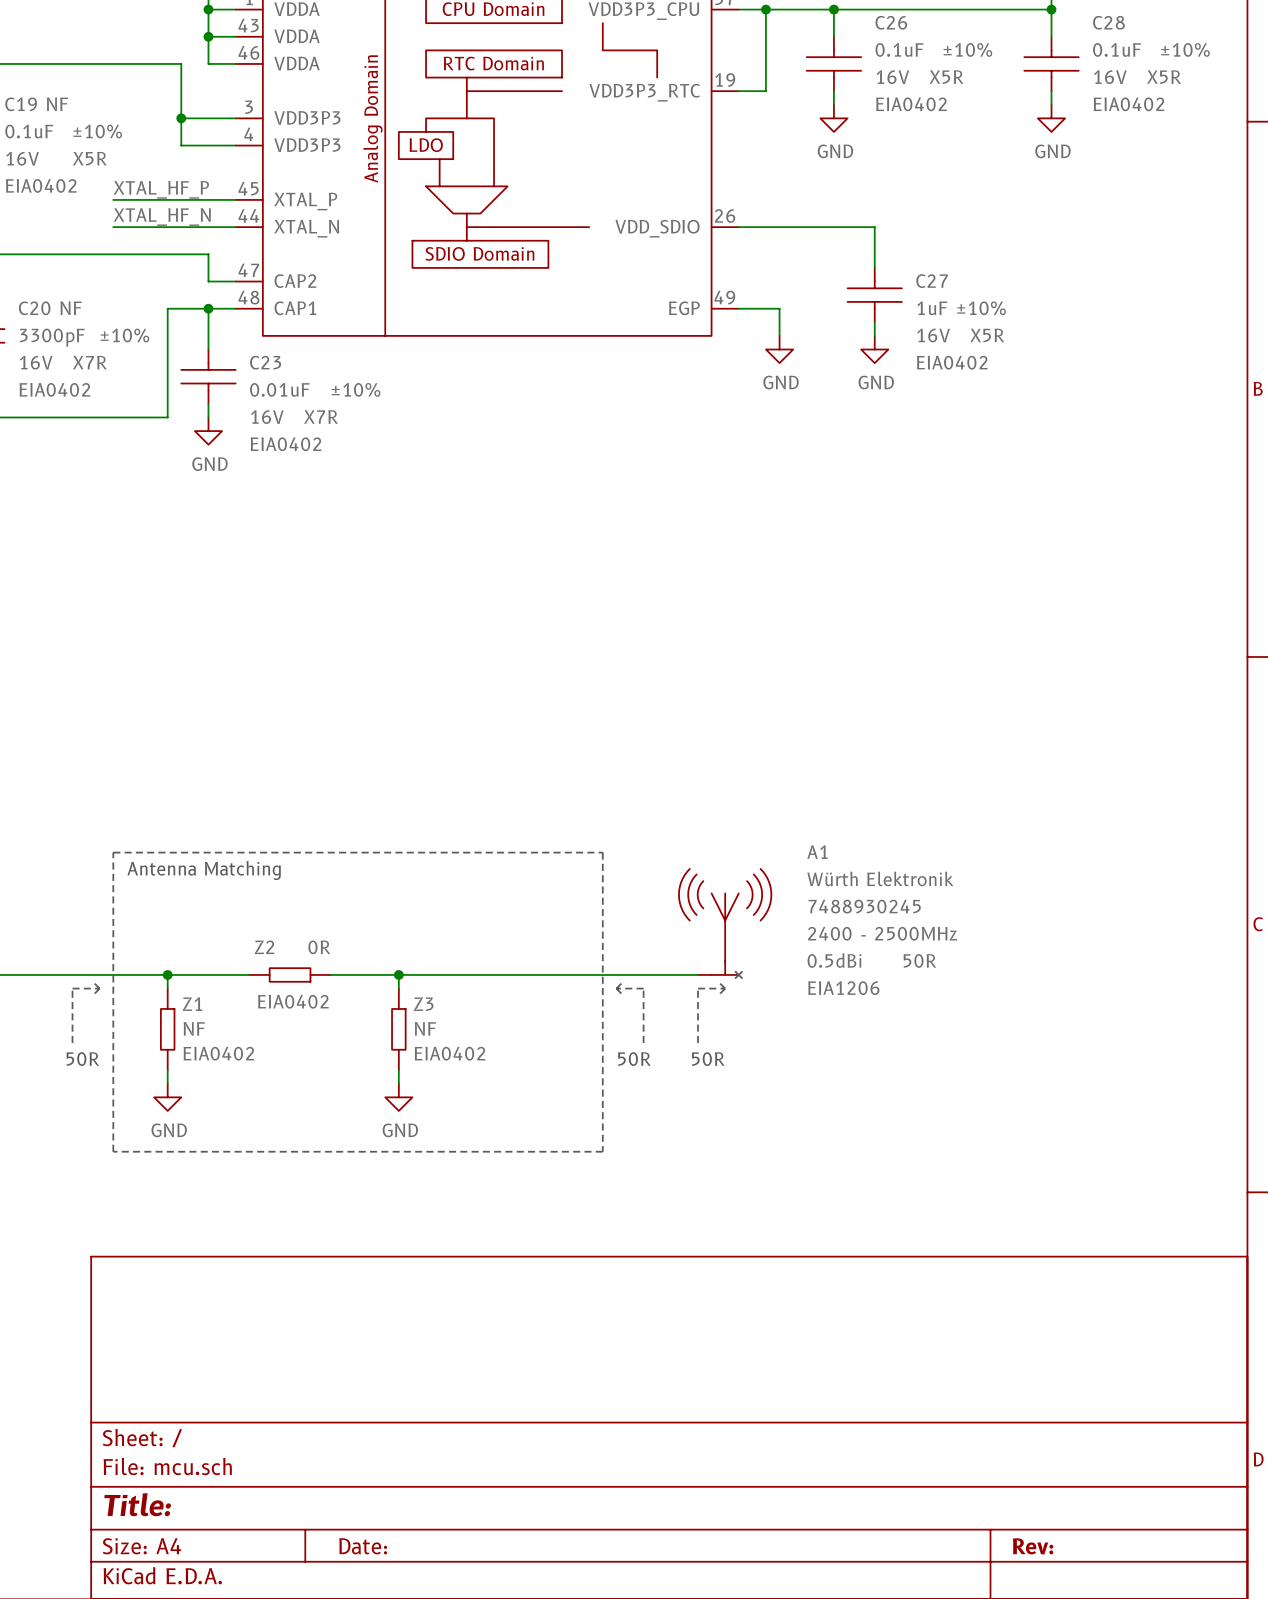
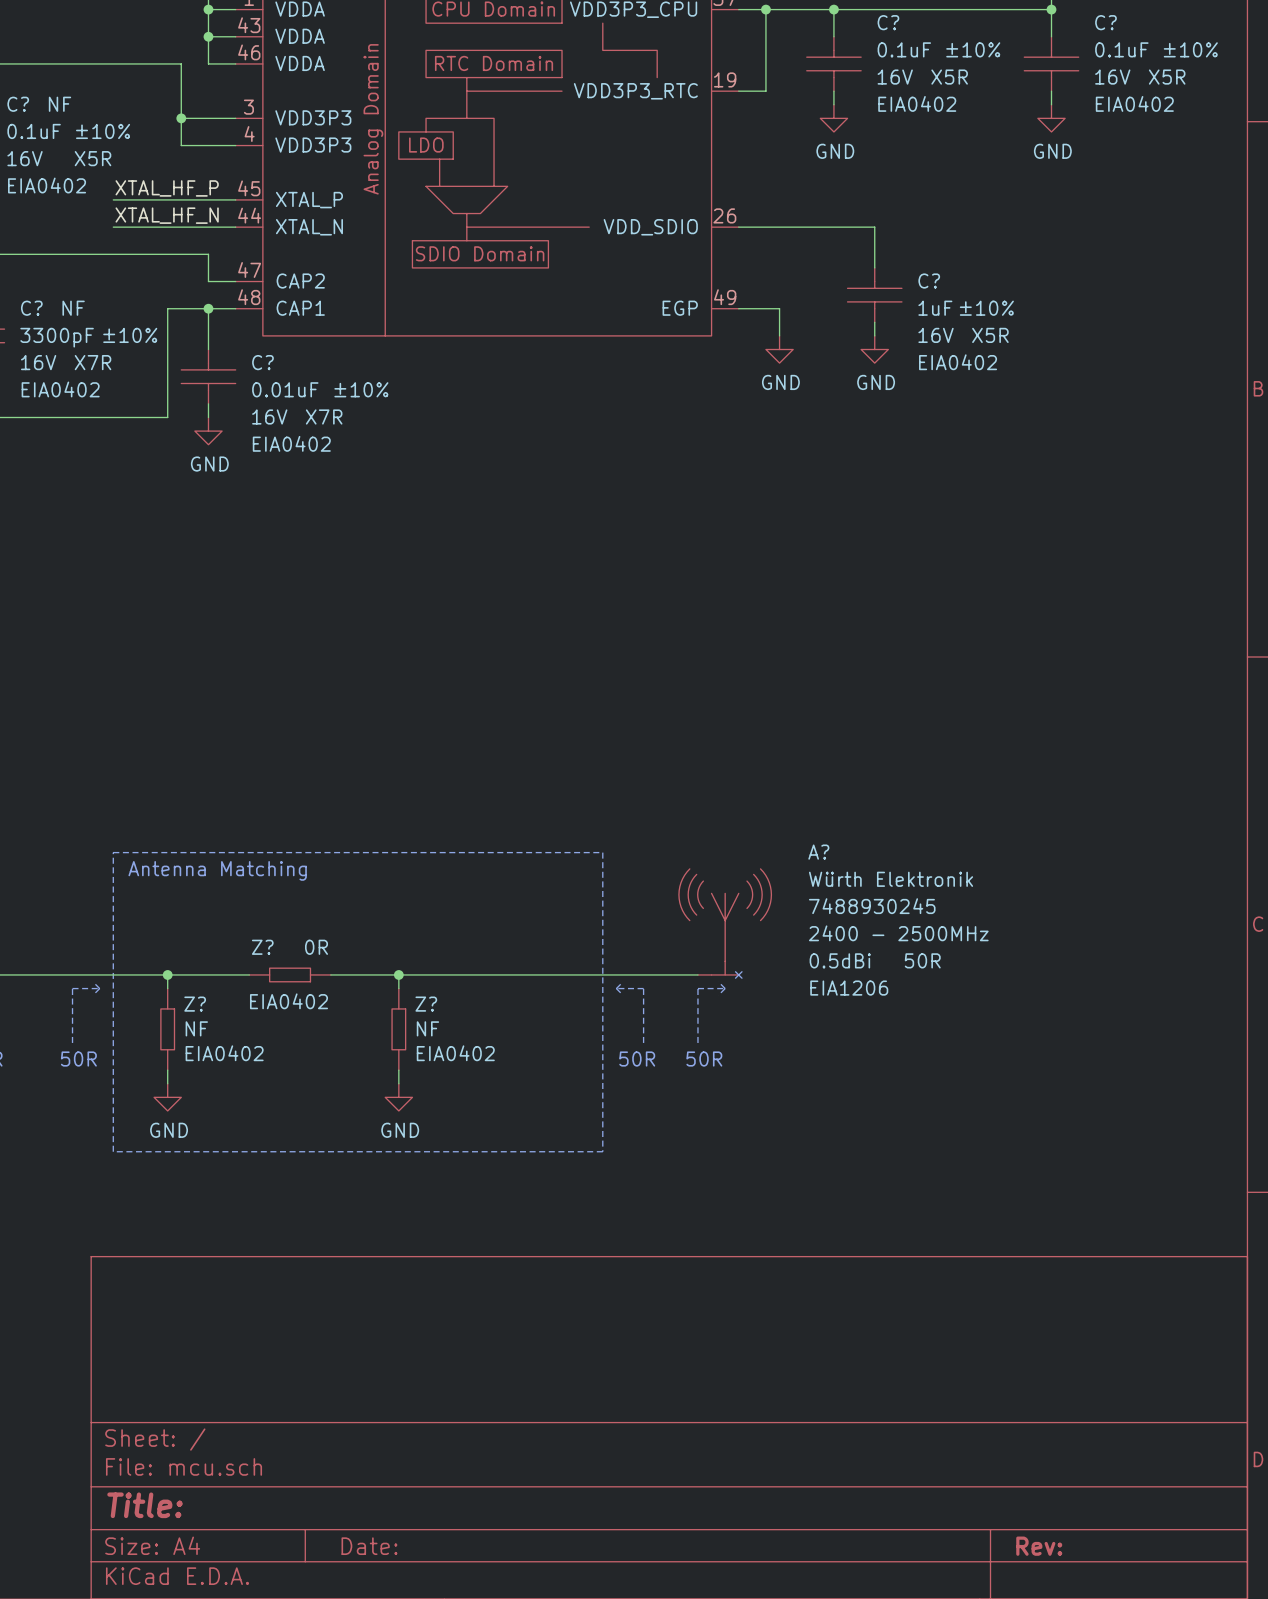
C26 name: C26 (891, 22) -> C? (888, 22)
C28 name: C28 (1108, 22) -> C? (1105, 22)
C19 name: C19 (21, 104) -> C? (18, 104)
C27 name: C27 (932, 281) -> C? (929, 281)
C20 name: C20 (34, 308) -> C? (31, 308)
C23 name: C23 (265, 362) -> C? (262, 362)
A1 name: A1 (817, 852) -> A? (818, 852)
Z2 name: Z2 (264, 947) -> Z? (262, 947)
Z1 name: Z1 (192, 1004) -> Z? (195, 1004)
Z3 name: Z3 (423, 1004) -> Z? (426, 1004)

